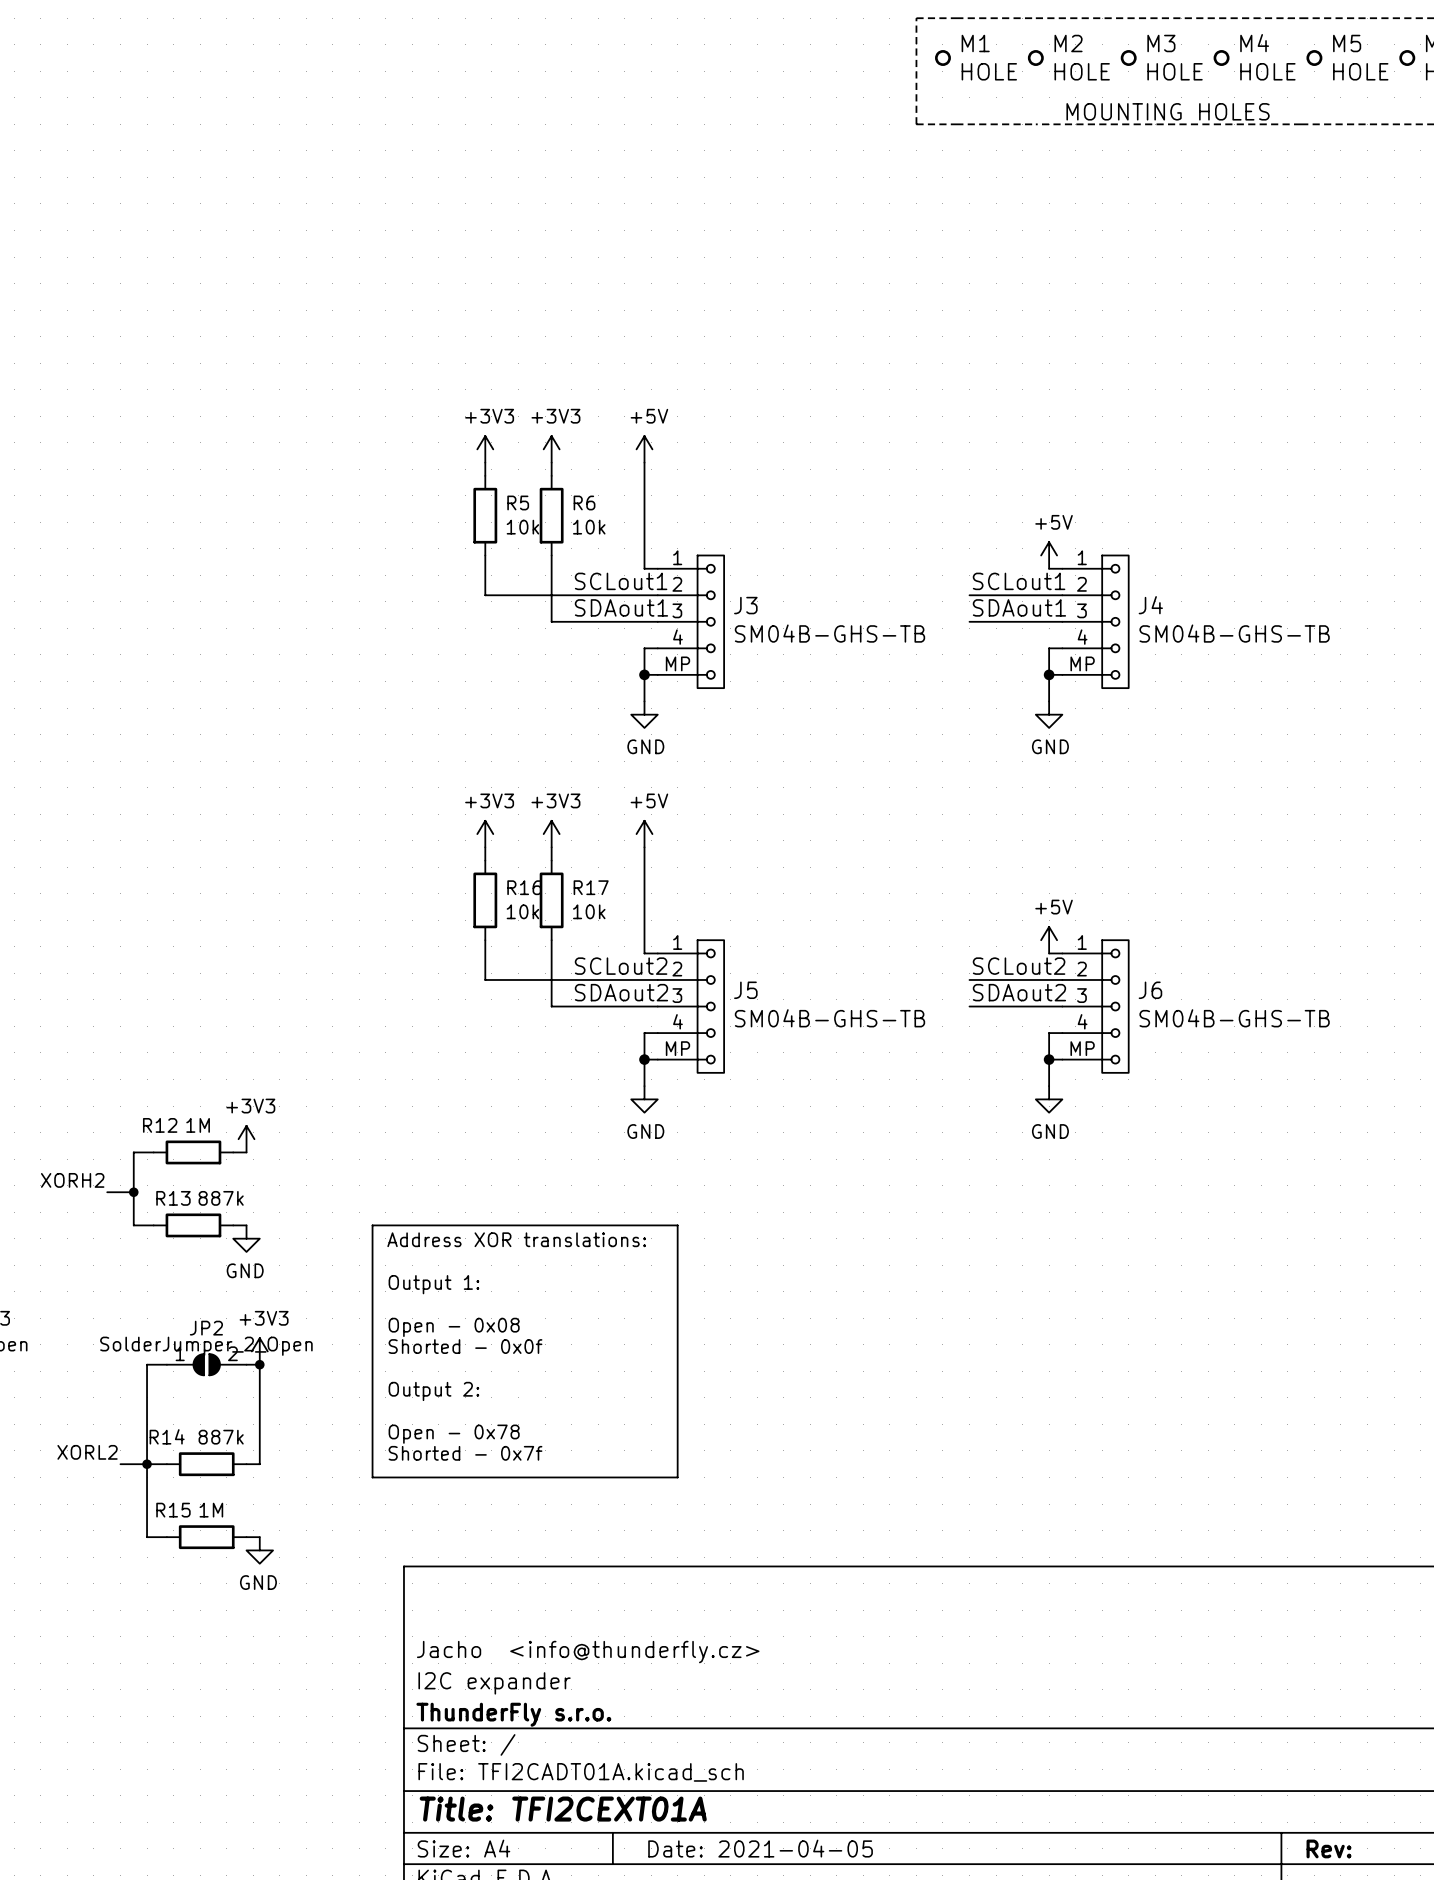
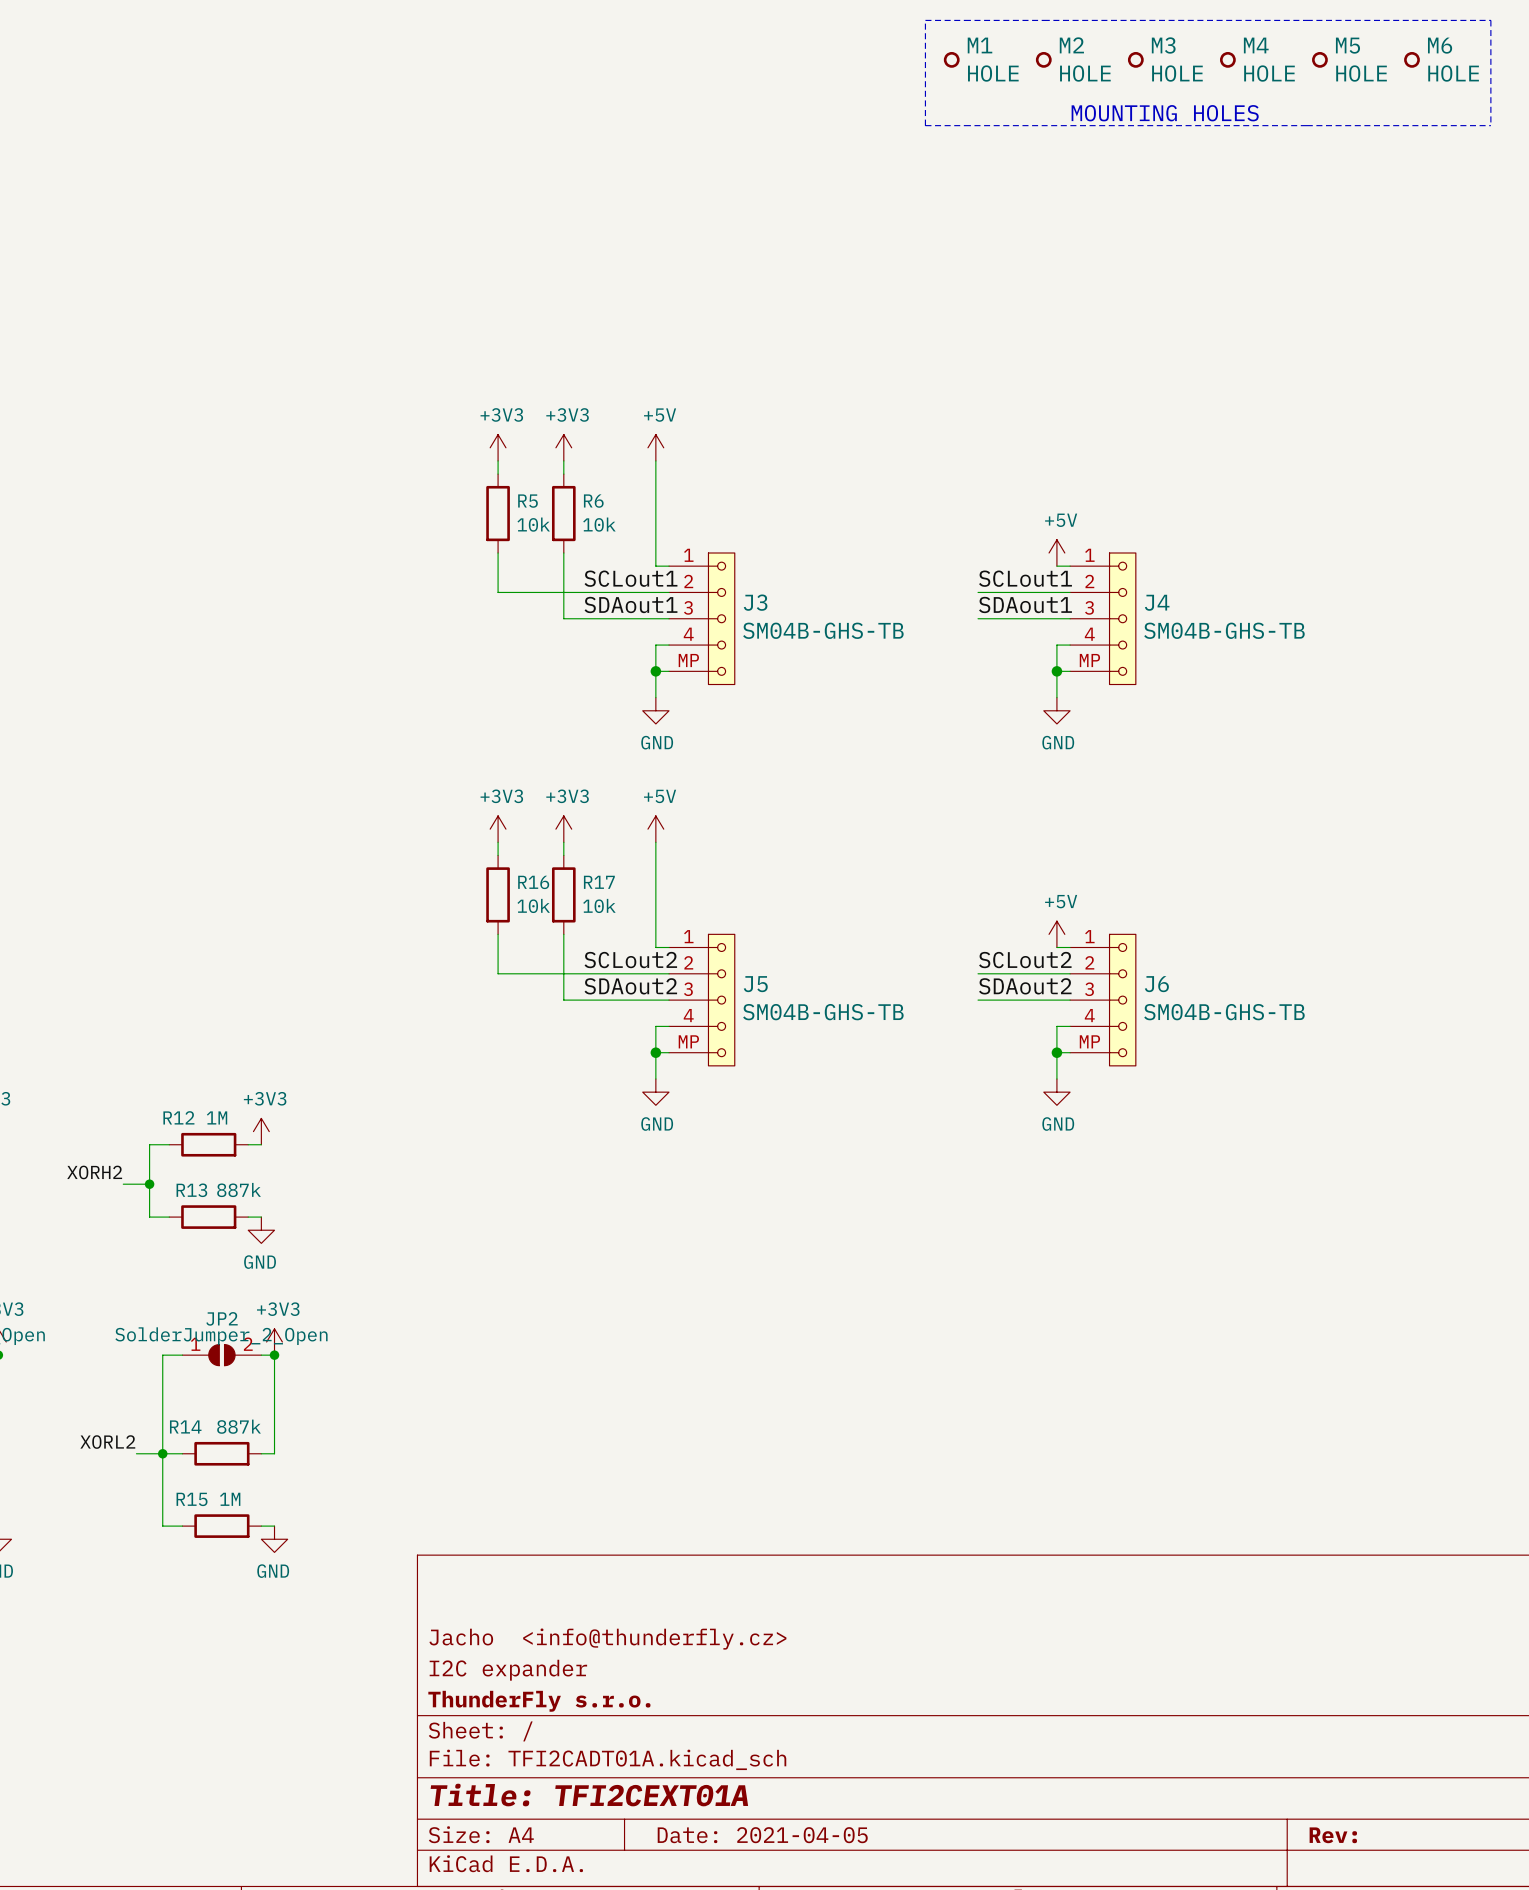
line: (372, 1225) (677, 1225) (677, 1477) (372, 1477) (372, 1225) -> none
text: Address XOR translations: (516, 1239) -> none
text: Output 1: (433, 1284) -> none
text: Open - 0x08 (454, 1327) -> none
text: Shorted - 0x0f (465, 1346) -> none
text: Output 2: (433, 1391) -> none
text: Open - 0x78 (454, 1434) -> none
text: Shorted - 0x7f (465, 1453) -> none

